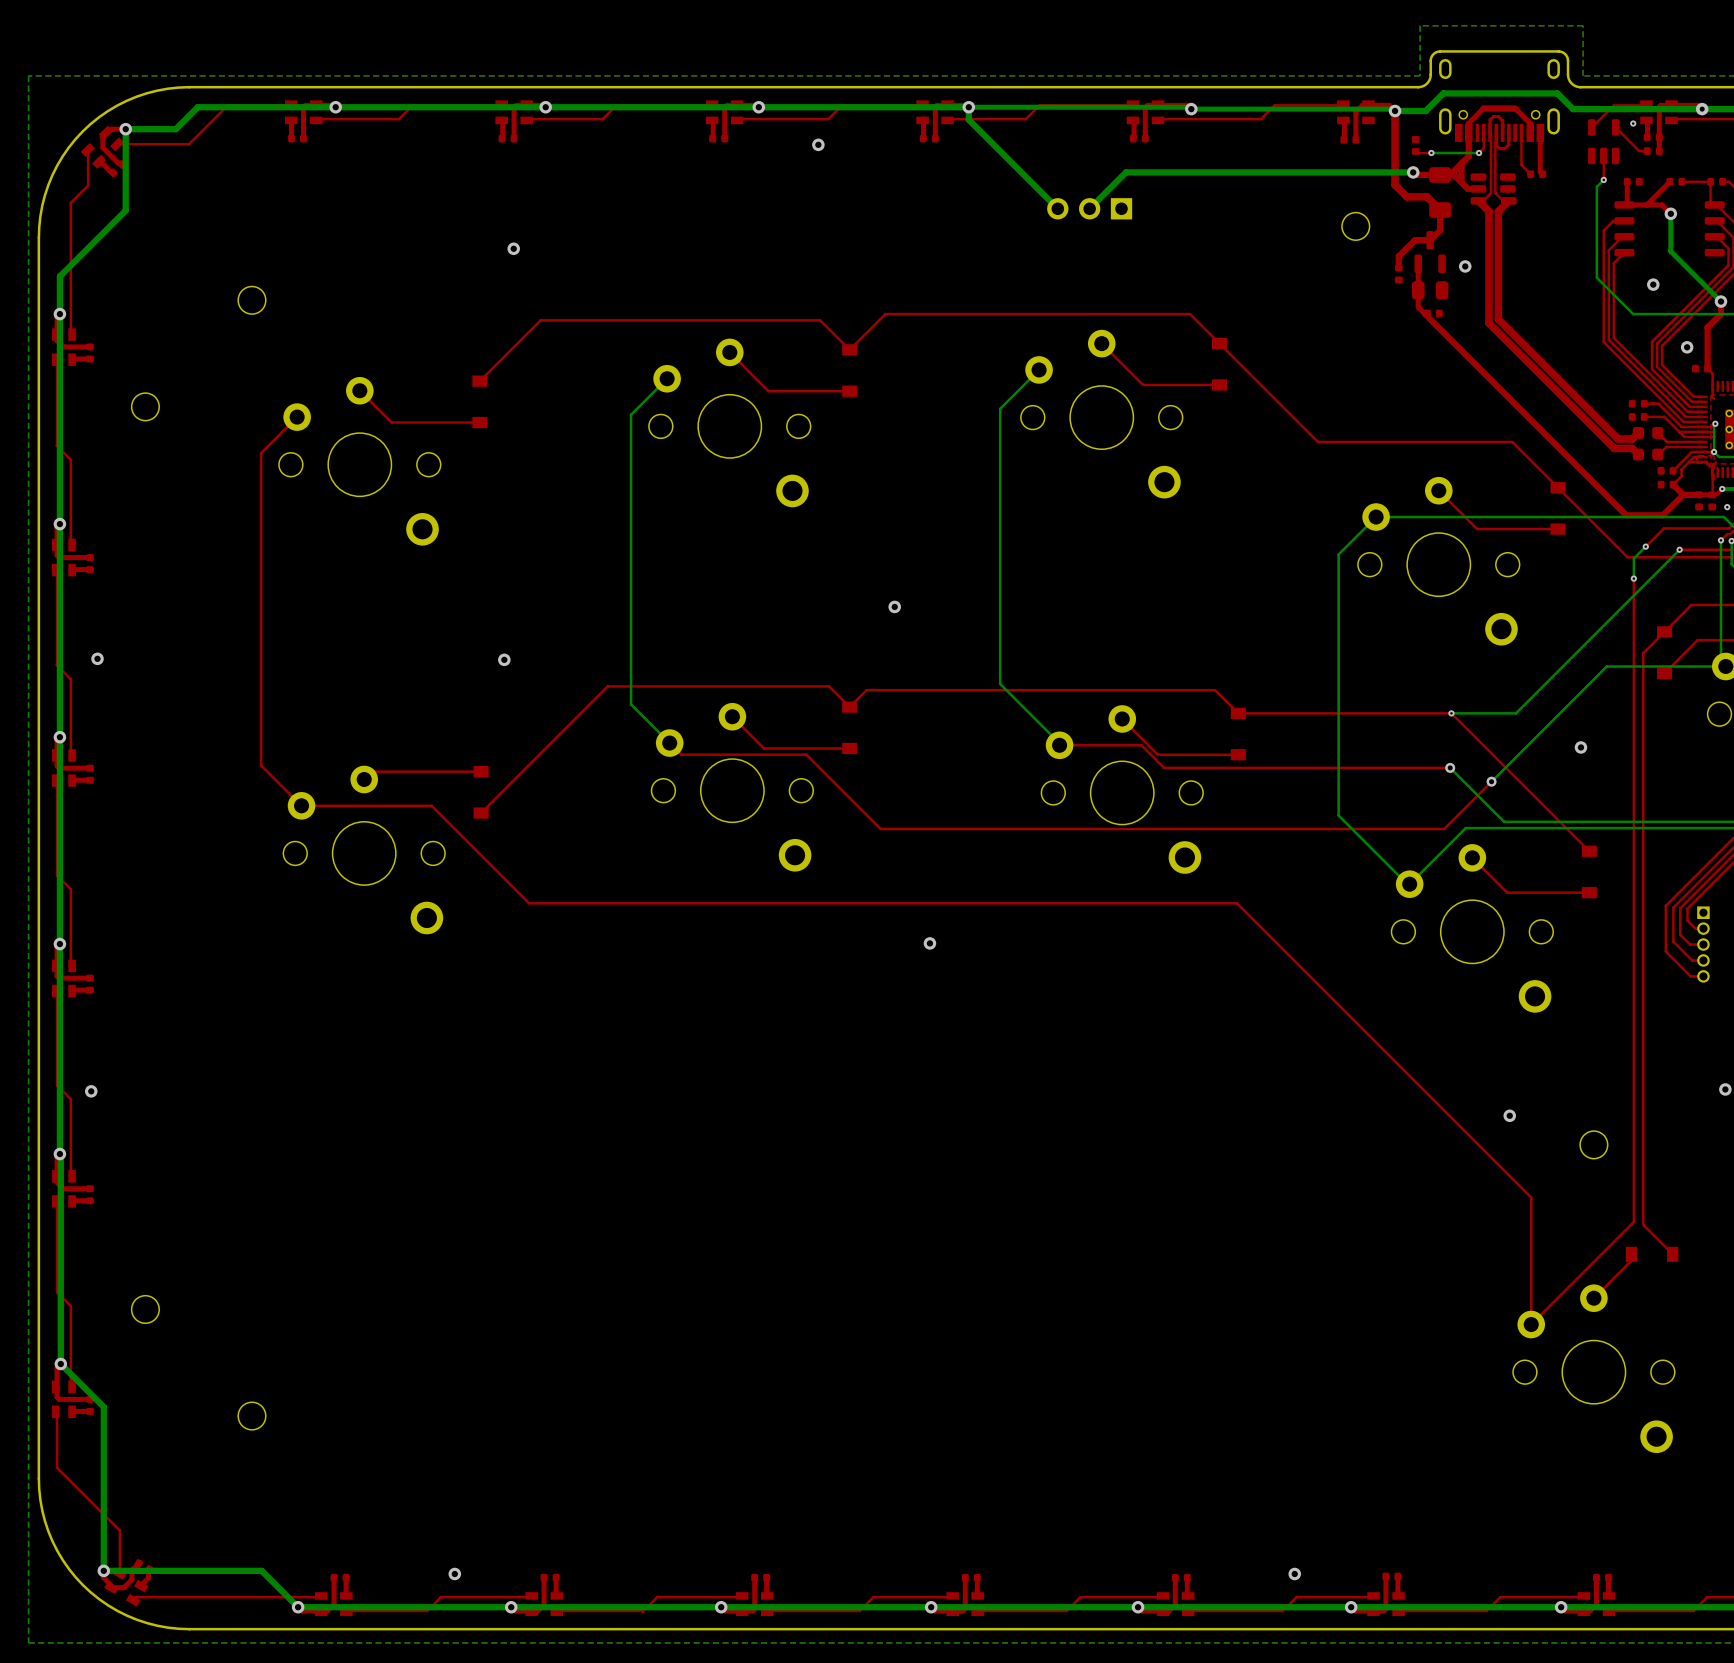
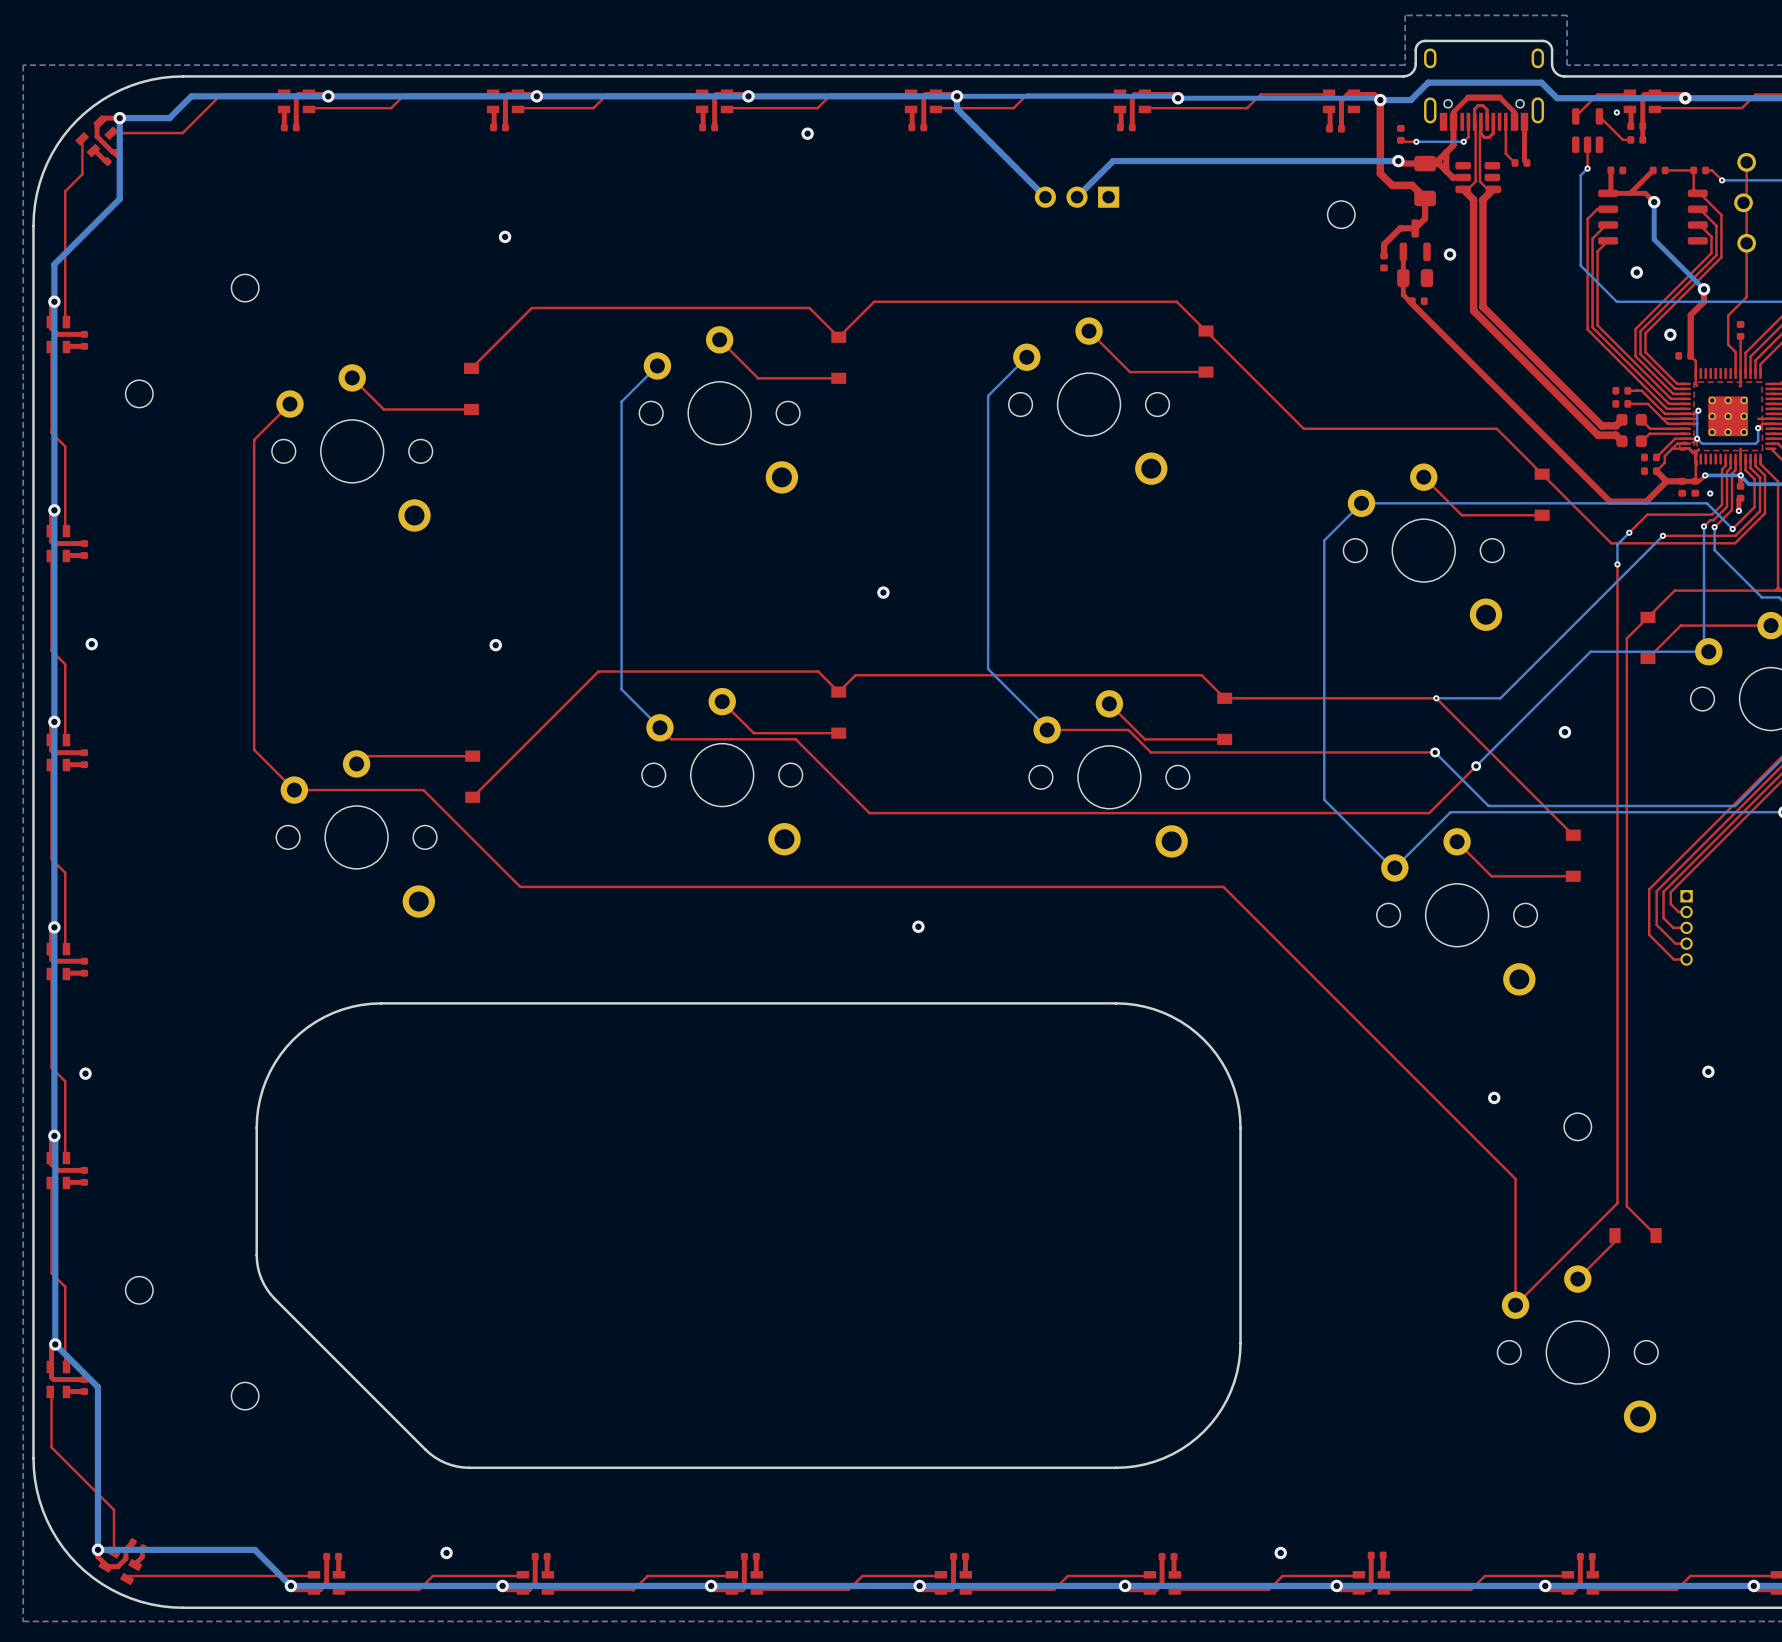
board edge: none -> (1116, 1003) (381, 1003) (361, 1004) (342, 1009) (316, 1021) (293, 1039) (275, 1062) (262, 1089) (258, 1108) (256, 1127) (256, 1255) (259, 1273) (267, 1289) (274, 1299) (425, 1449) (440, 1460) (457, 1466) (1116, 1467) (1135, 1466) (1154, 1461) (1181, 1449) (1204, 1431) (1216, 1416) (1226, 1399) (1237, 1372) (1240, 1343) (1240, 1118) (1237, 1098) (1231, 1080) (1216, 1054) (1204, 1039) (1189, 1027) (1163, 1012) (1145, 1006) (1116, 1003)

